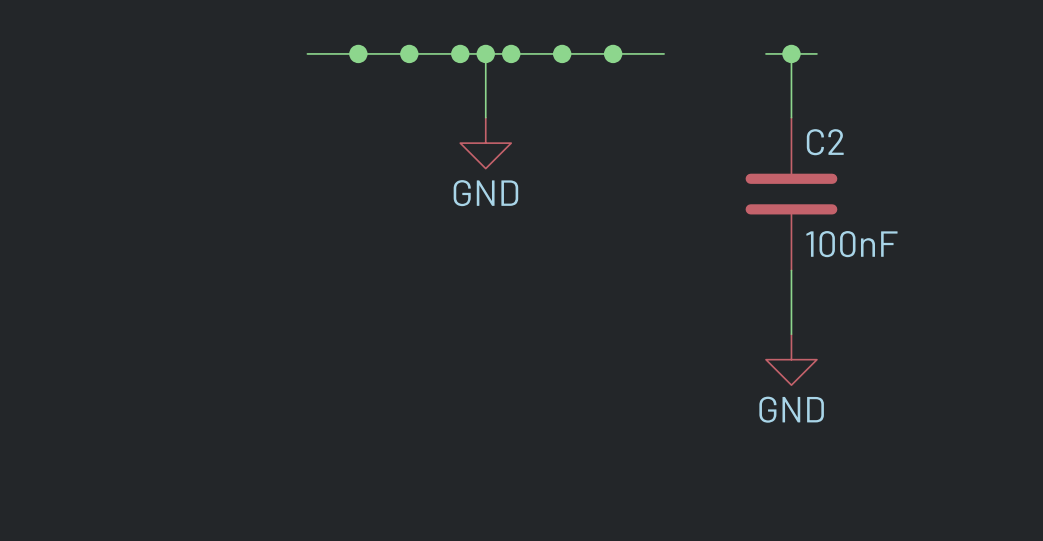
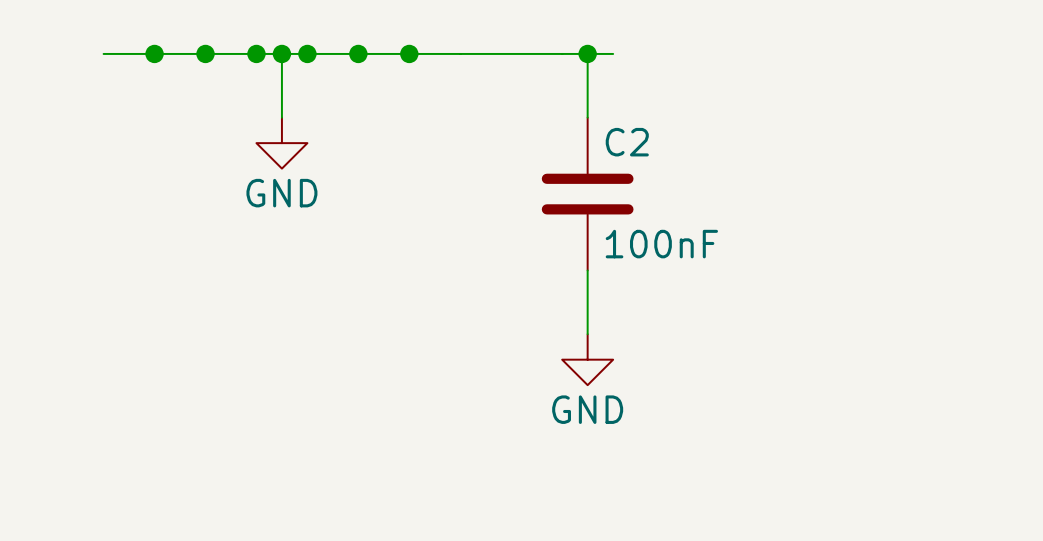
wire: none -> (103, 53) (307, 53)
junction: none -> (154, 53)
junction: none -> (205, 53)
junction: none -> (256, 53)
junction: none -> (281, 53)
junction: none -> (307, 53)
junction: (460, 53) -> none
wire: (485, 53) (485, 117) -> (281, 53) (281, 117)
junction: (485, 53) -> none
junction: (511, 53) -> none
junction: (562, 53) -> none
junction: none -> (587, 53)
wire: (613, 53) (664, 53) -> none
junction: (613, 53) -> none
wire: (765, 53) (816, 53) -> none
wire: (791, 53) (791, 117) -> (587, 53) (587, 117)
junction: (791, 53) -> none
power symbol: none -> GND (281, 143)
power symbol: GND (485, 143) -> none
C2 position: (791, 194) -> (587, 194)
wire: (791, 270) (791, 334) -> (587, 270) (587, 334)
power symbol: none -> GND (587, 359)
power symbol: GND (791, 359) -> none

